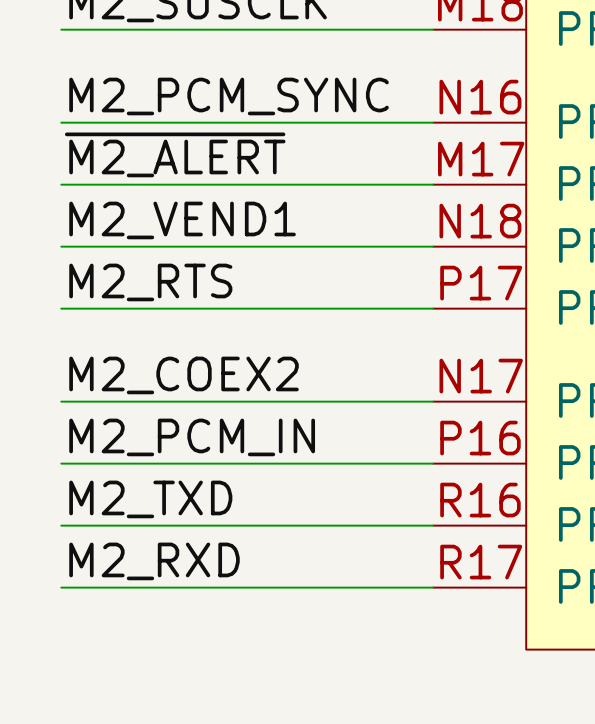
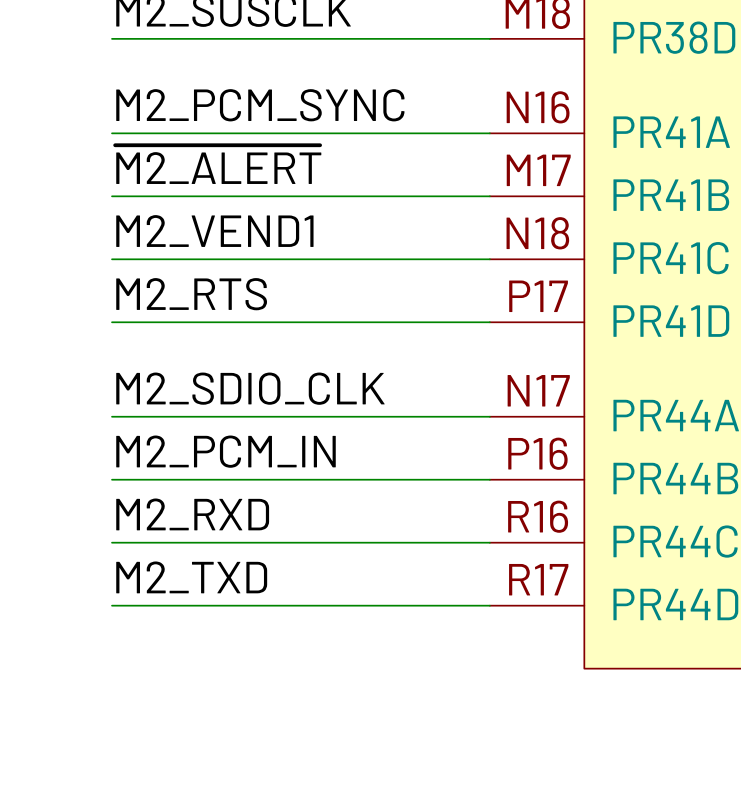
label: M2_COEX2 (184, 375) -> M2_SDIO_CLK (250, 388)
label: M2_TXD (150, 499) -> M2_RXD (192, 514)
label: M2_RXD (154, 561) -> M2_TXD (191, 577)

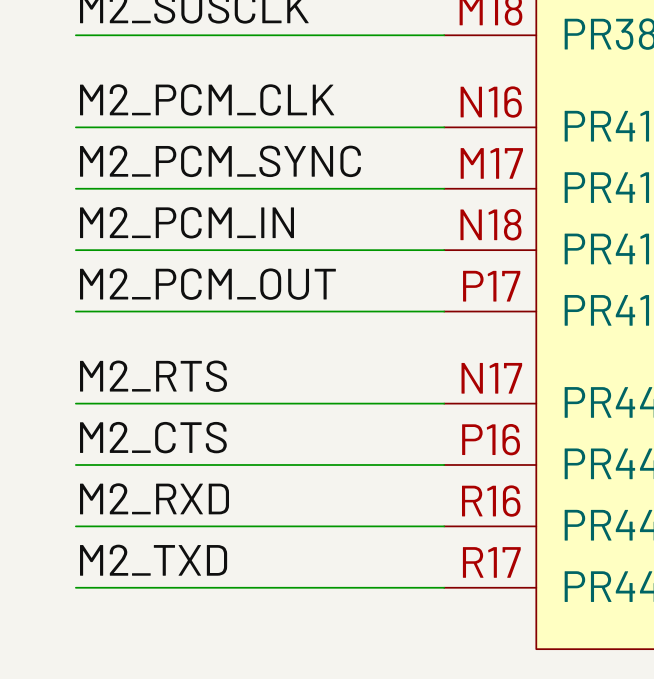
label: M2_PCM_SYNC (260, 105) -> M2_PCM_CLK (207, 100)
label: ~{M2_ALERT} (218, 164) -> M2_PCM_SYNC (220, 161)
label: M2_VEND1 (214, 231) -> M2_PCM_IN (187, 222)
label: M2_RTS (191, 294) -> M2_PCM_OUT (207, 284)
label: M2_SDIO_CLK (250, 388) -> M2_RTS (153, 376)
label: M2_PCM_IN (225, 451) -> M2_CTS (153, 437)

